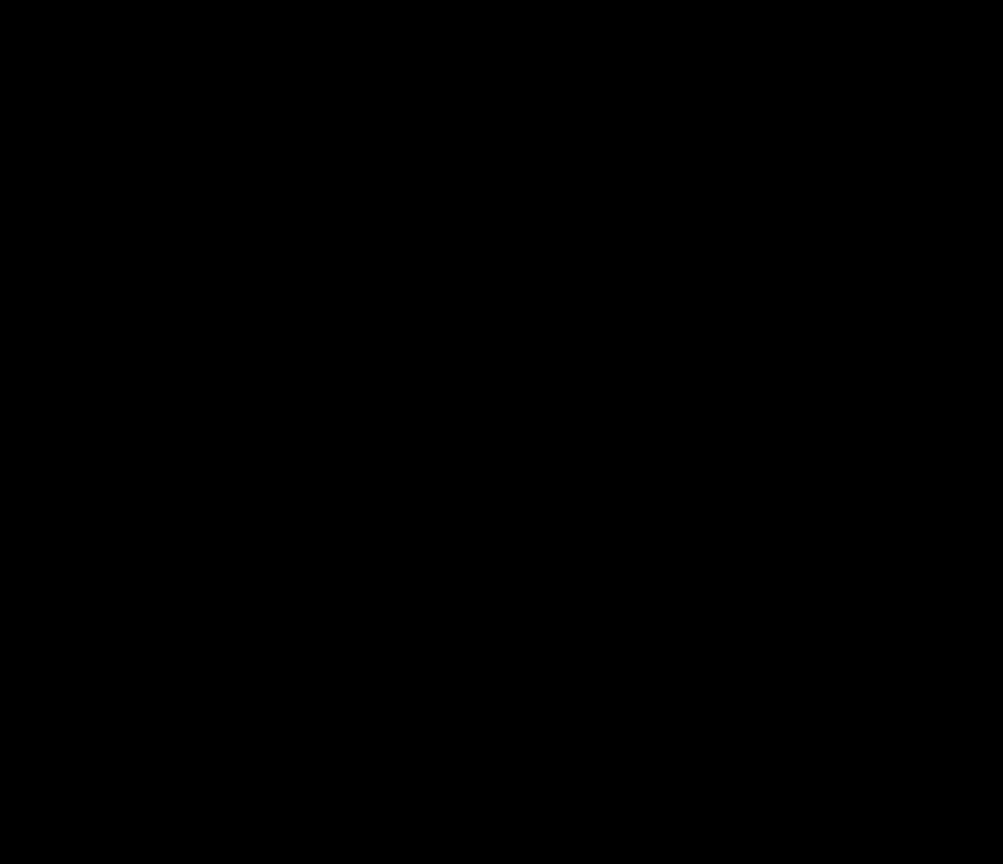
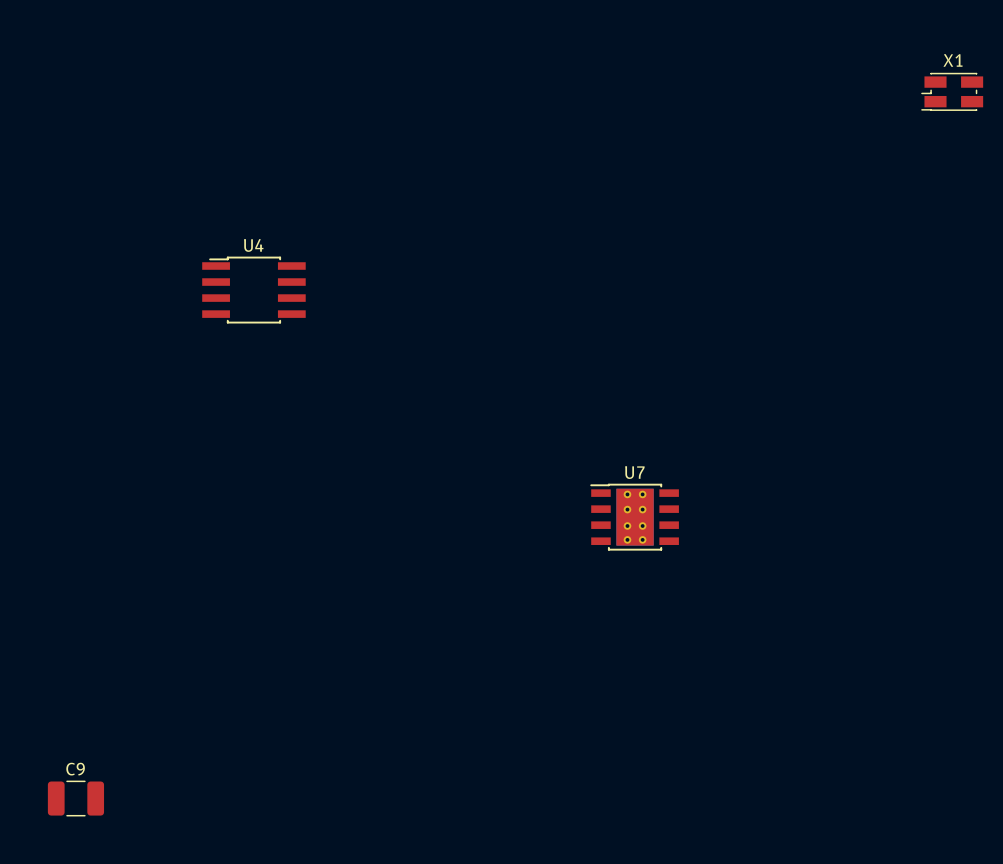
X1: none -> (952, 91)
U4: none -> (253, 290)
U7: none -> (634, 517)
C9: none -> (75, 798)

